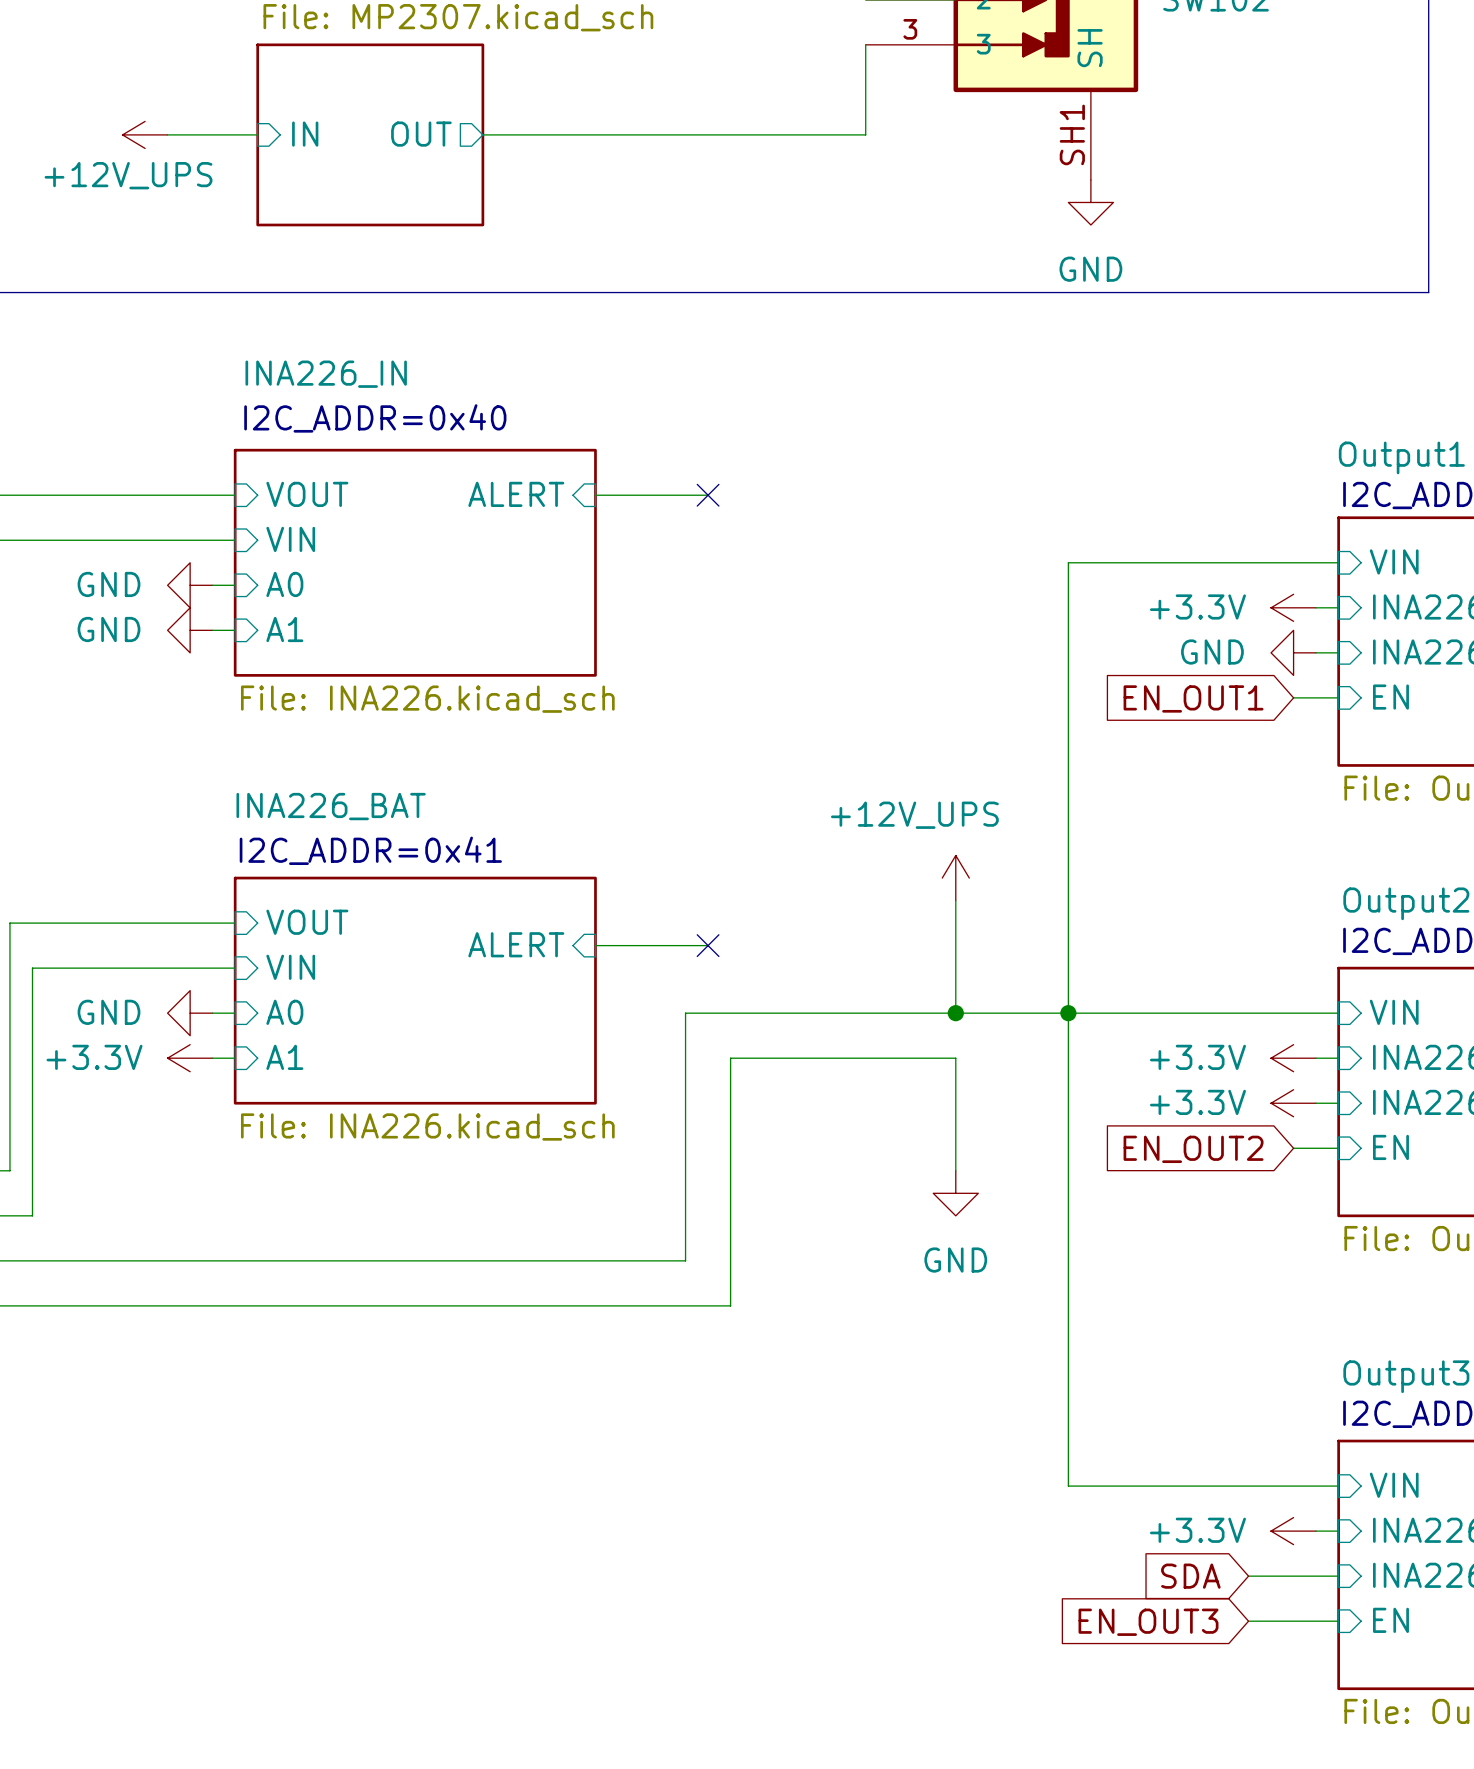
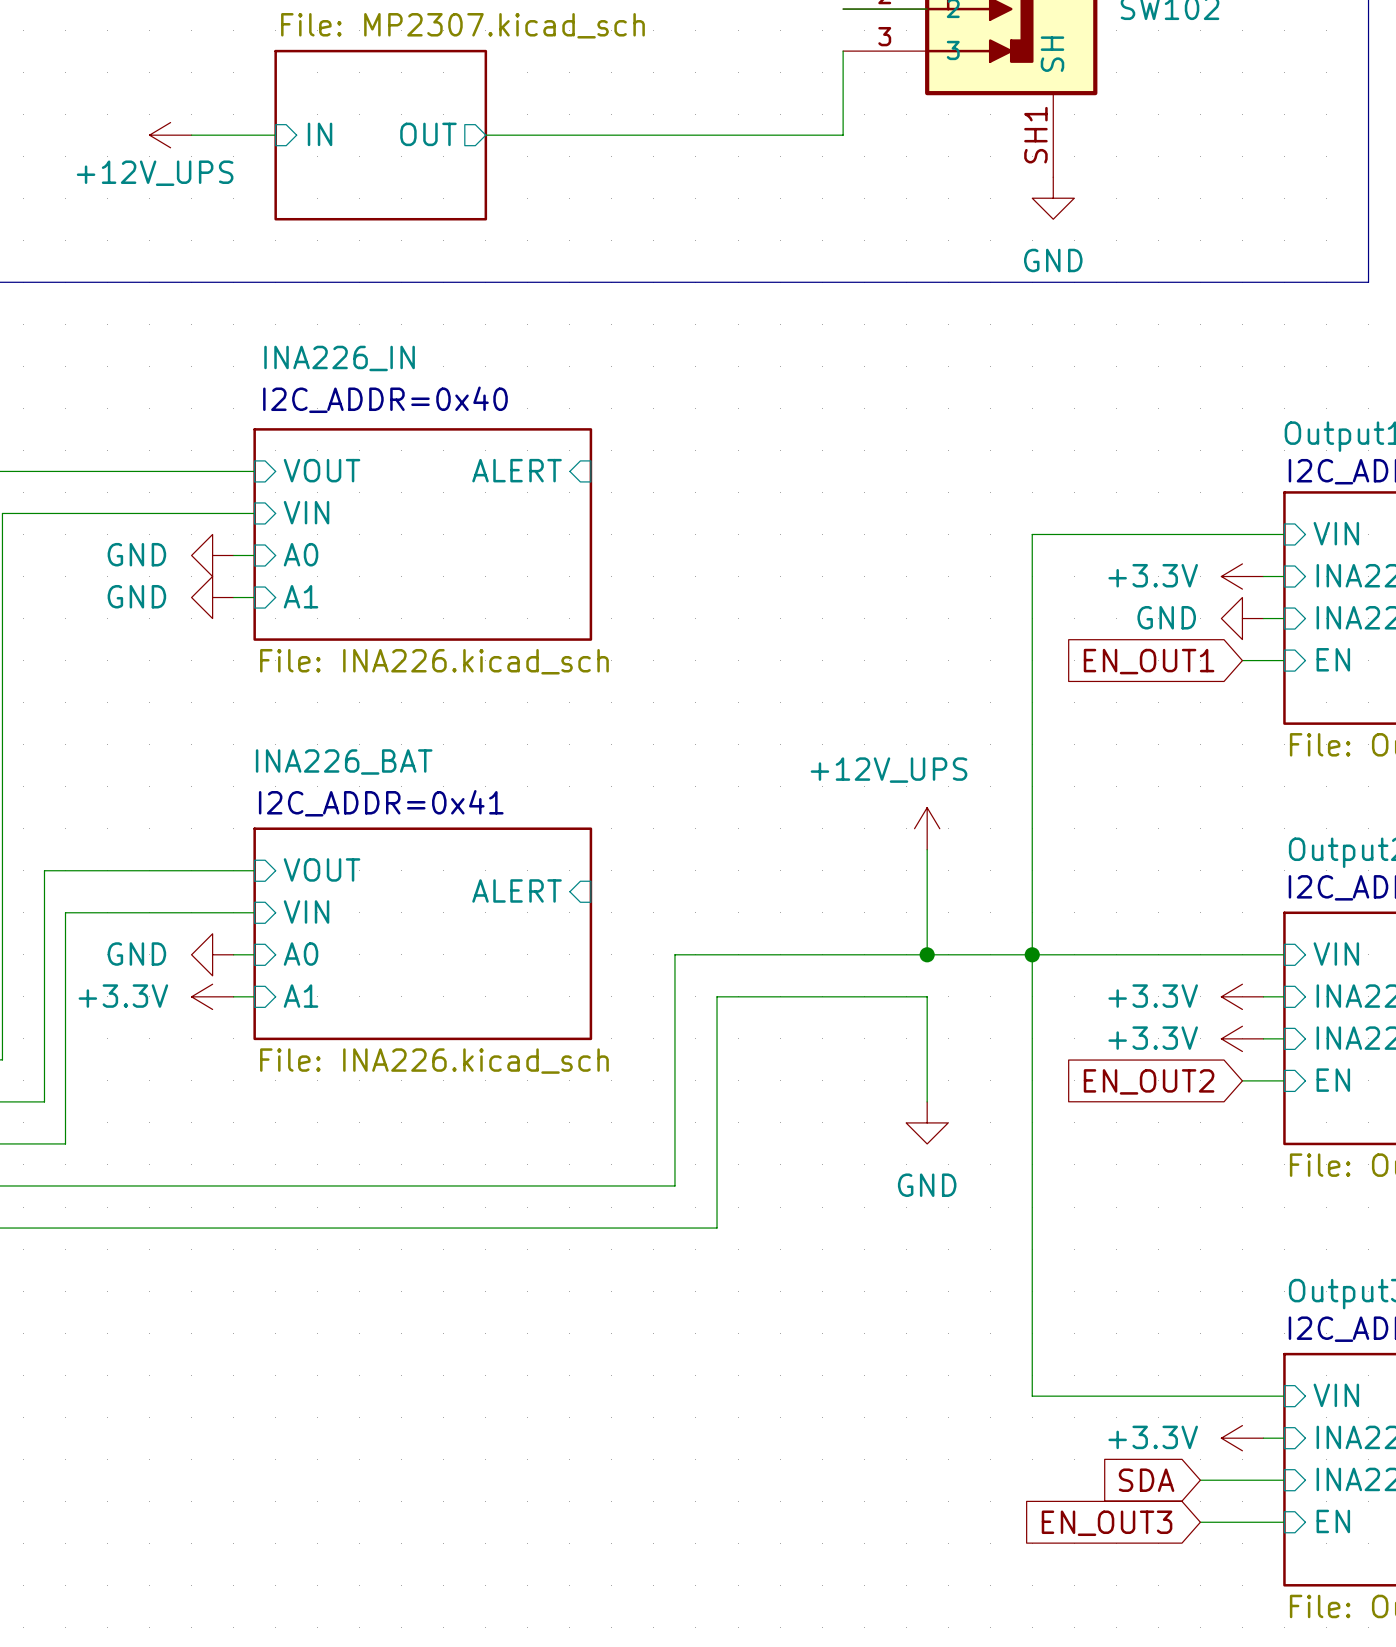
wire: (595, 495) (708, 495) -> none
no-connect mark: (708, 495) -> none
wire: (595, 945) (708, 945) -> none
no-connect mark: (708, 945) -> none

